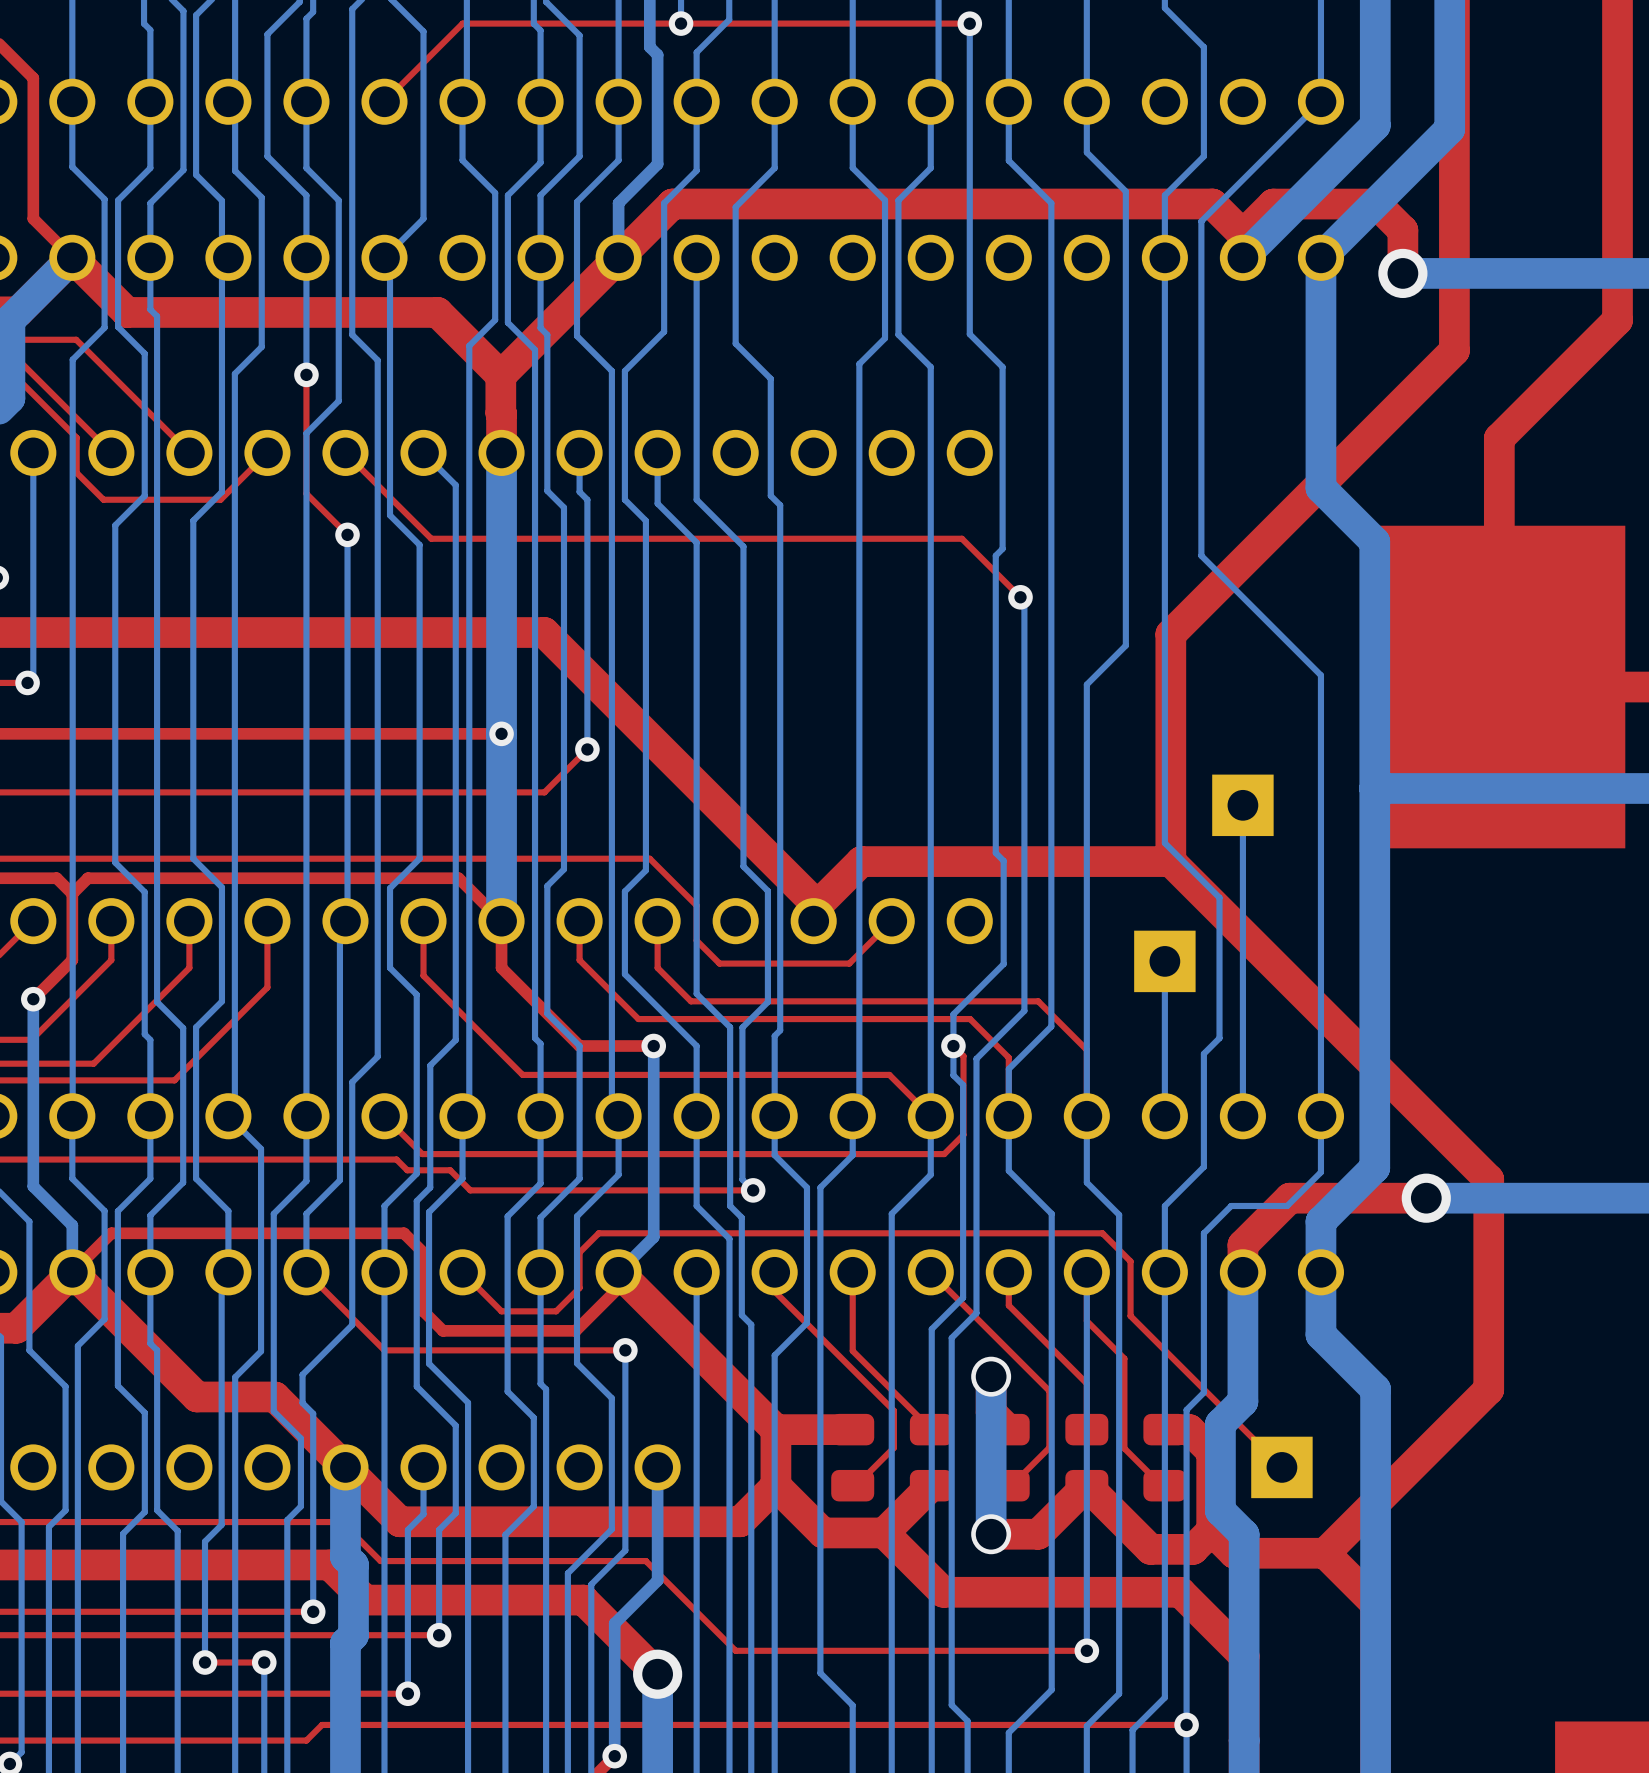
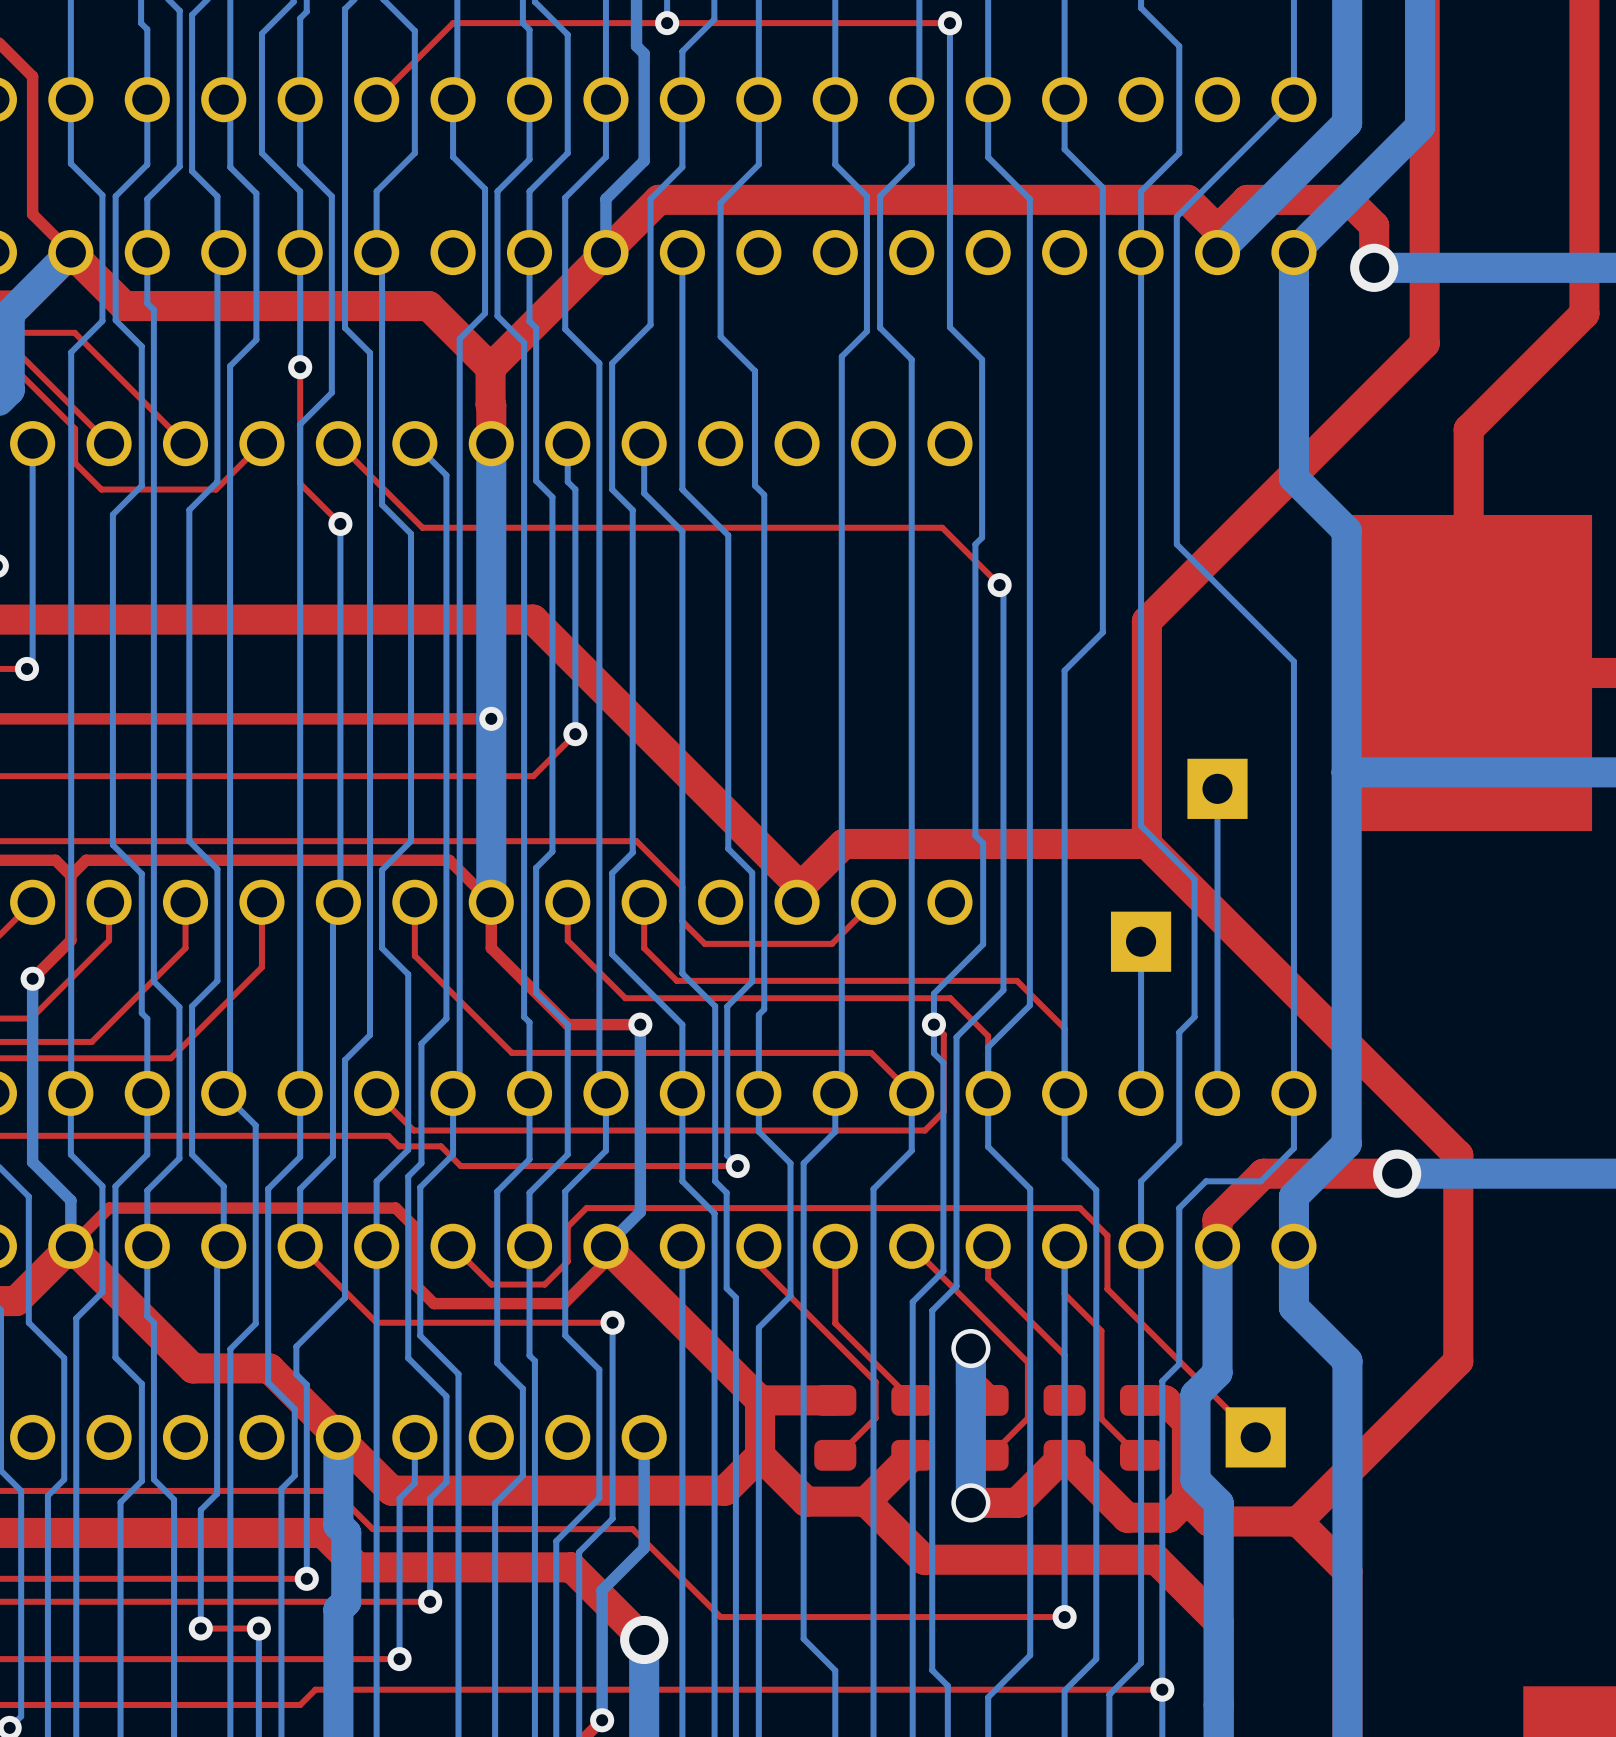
bottom track: (423, 156) (423, 218) (384, 257) -> (414, 153) (376, 191) (376, 252)

